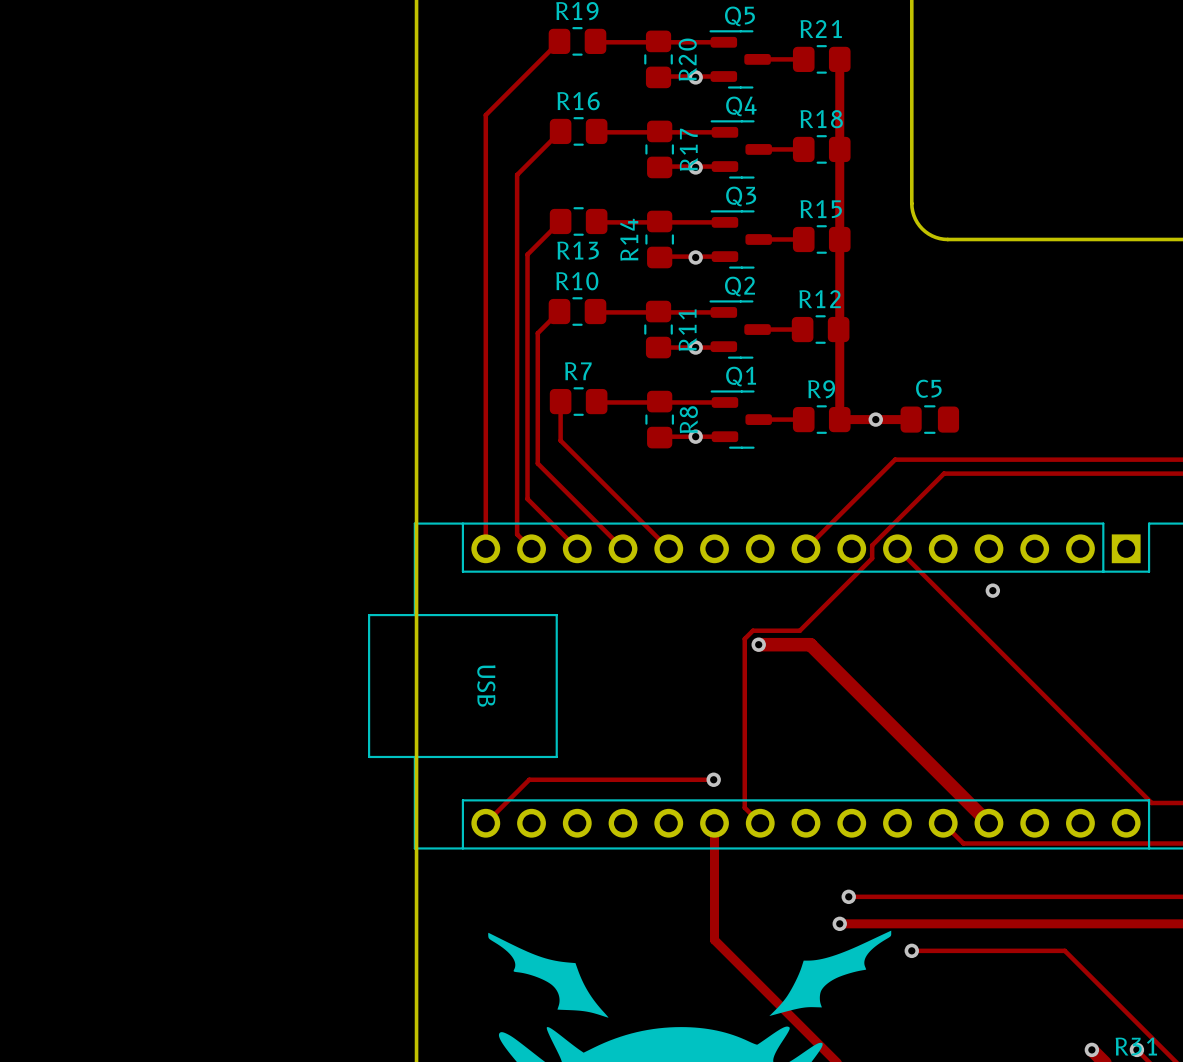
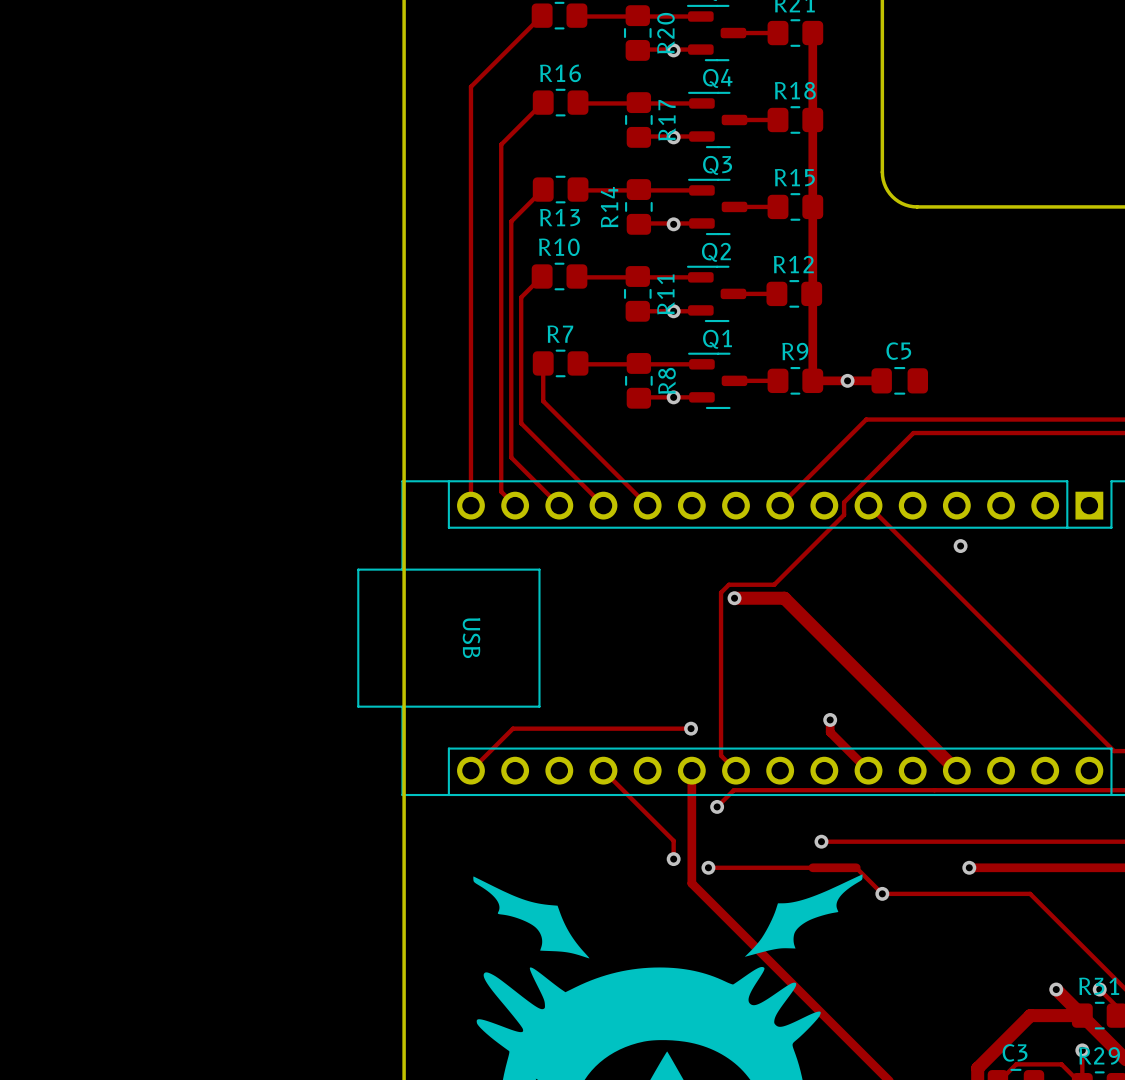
track: none -> (830, 719) (830, 732) (868, 770)
via: none -> (830, 719)
track: none -> (603, 770) (673, 840) (673, 859)
track: (943, 823) (963, 843) -> (717, 806) (733, 790) (932, 790)
via: none -> (717, 806)
via: none -> (673, 859)
track: none -> (708, 867) (812, 867)
via: none -> (708, 867)
via: (839, 923) -> none
track: (884, 923) (1001, 923) -> (856, 867) (882, 893)
via: none -> (969, 867)

